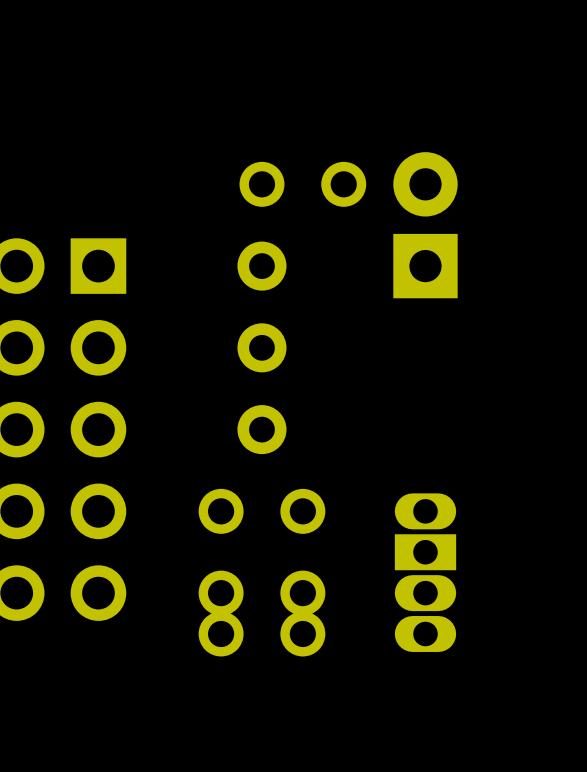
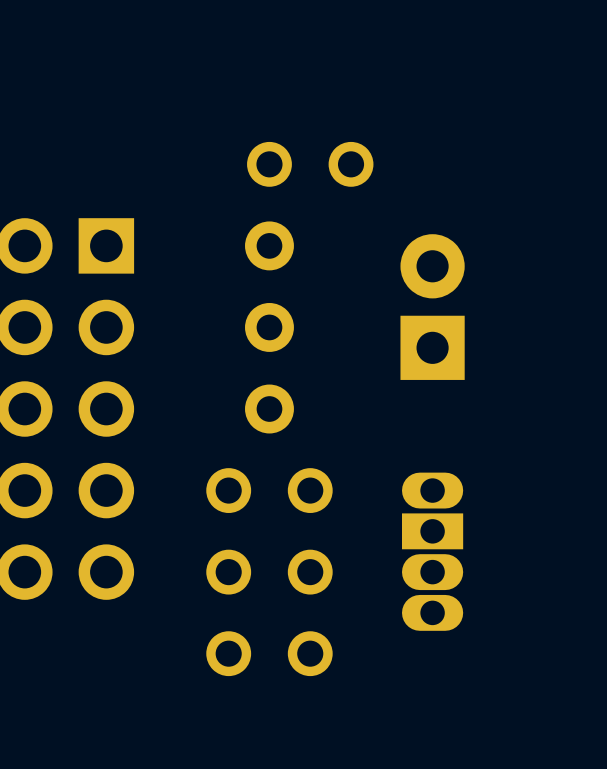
part position: (425, 225) -> (432, 307)
part position: (261, 633) -> (269, 653)

